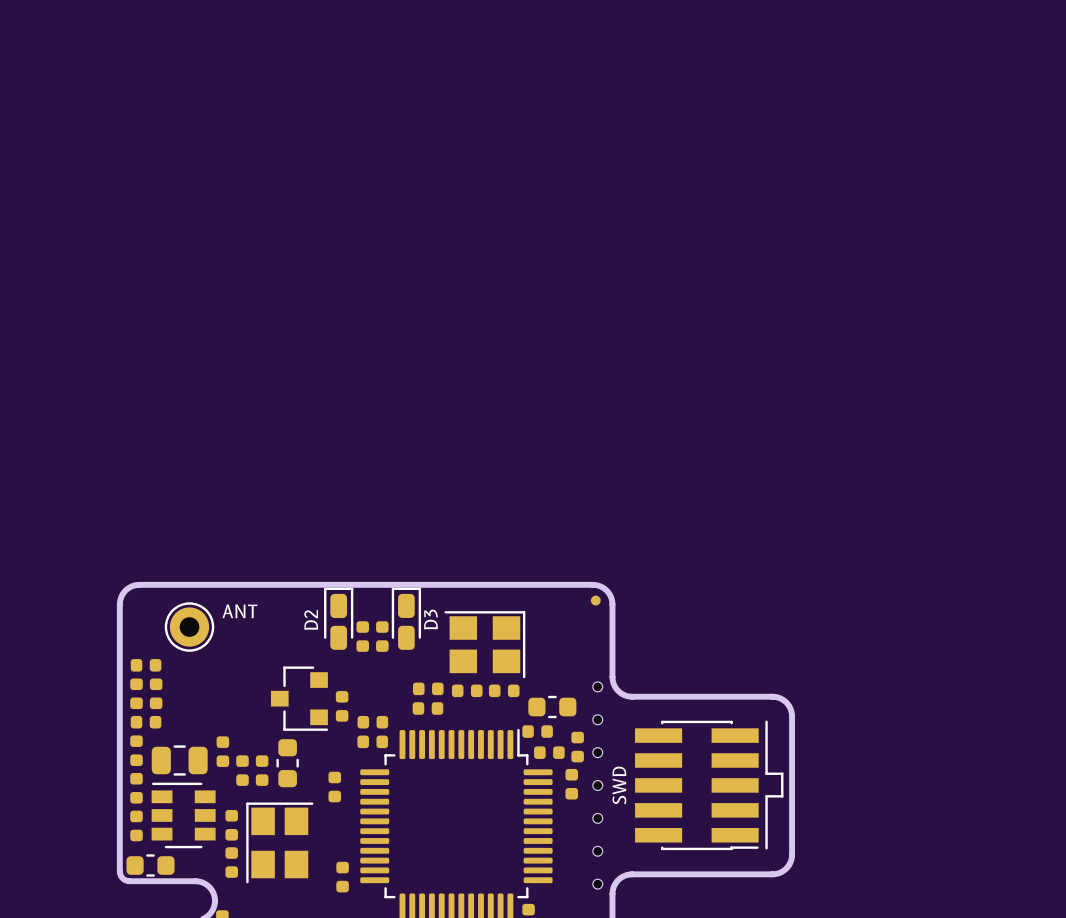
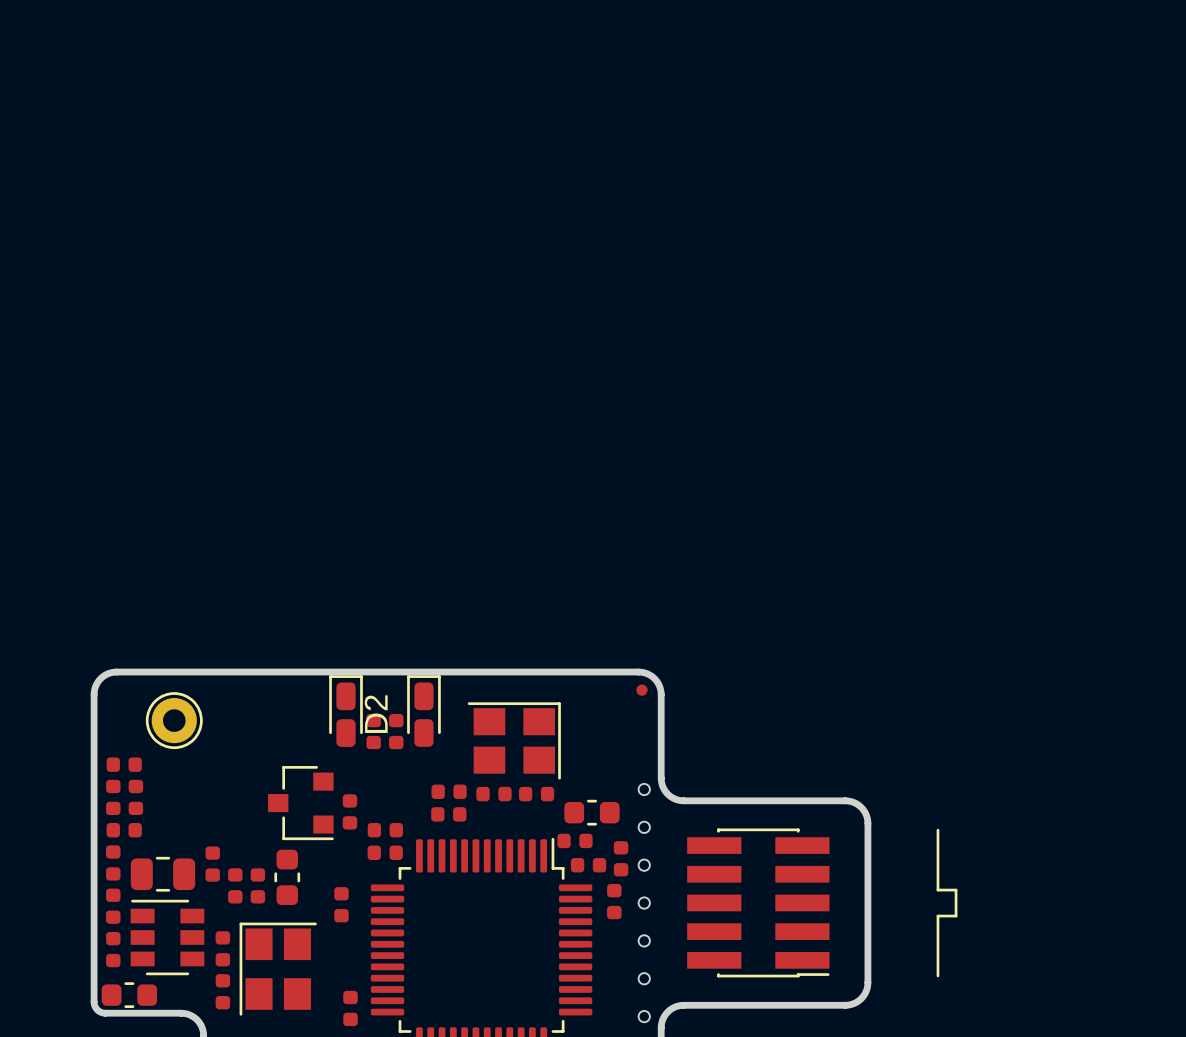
text: ANT (239, 611) -> none
text: D3 (430, 619) -> none
text: D2 (311, 620) -> none
D2 name: none -> D2 (376, 714)
line: (766, 721) (766, 773) (782, 773) (782, 796) (766, 796) (766, 848) -> (937, 830) (937, 890) (956, 890) (956, 916) (937, 916) (937, 975)
text: SWD (619, 785) -> none

